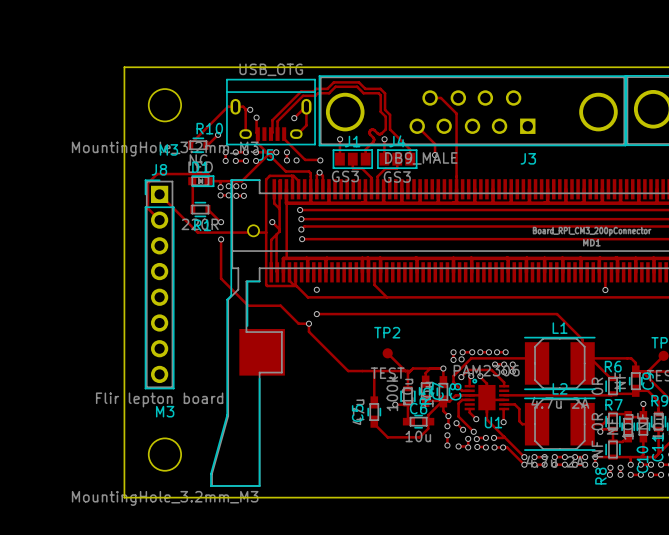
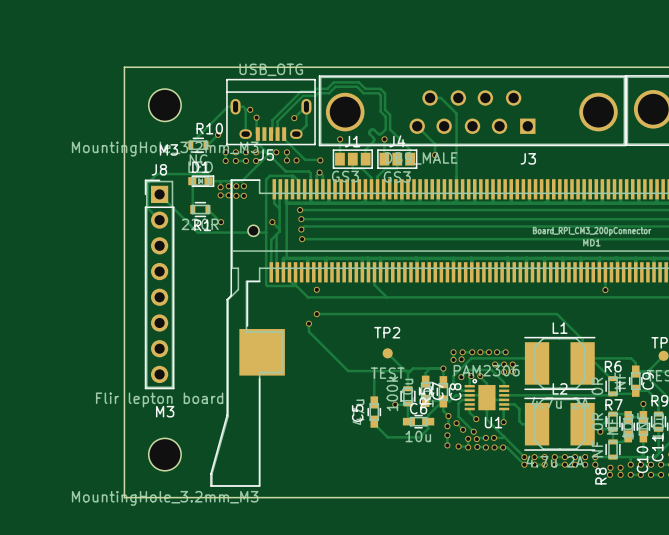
track: (221, 239) (221, 278) (248, 305) (280, 305) (298, 323) (308, 323) -> none
via: (221, 239) -> none

